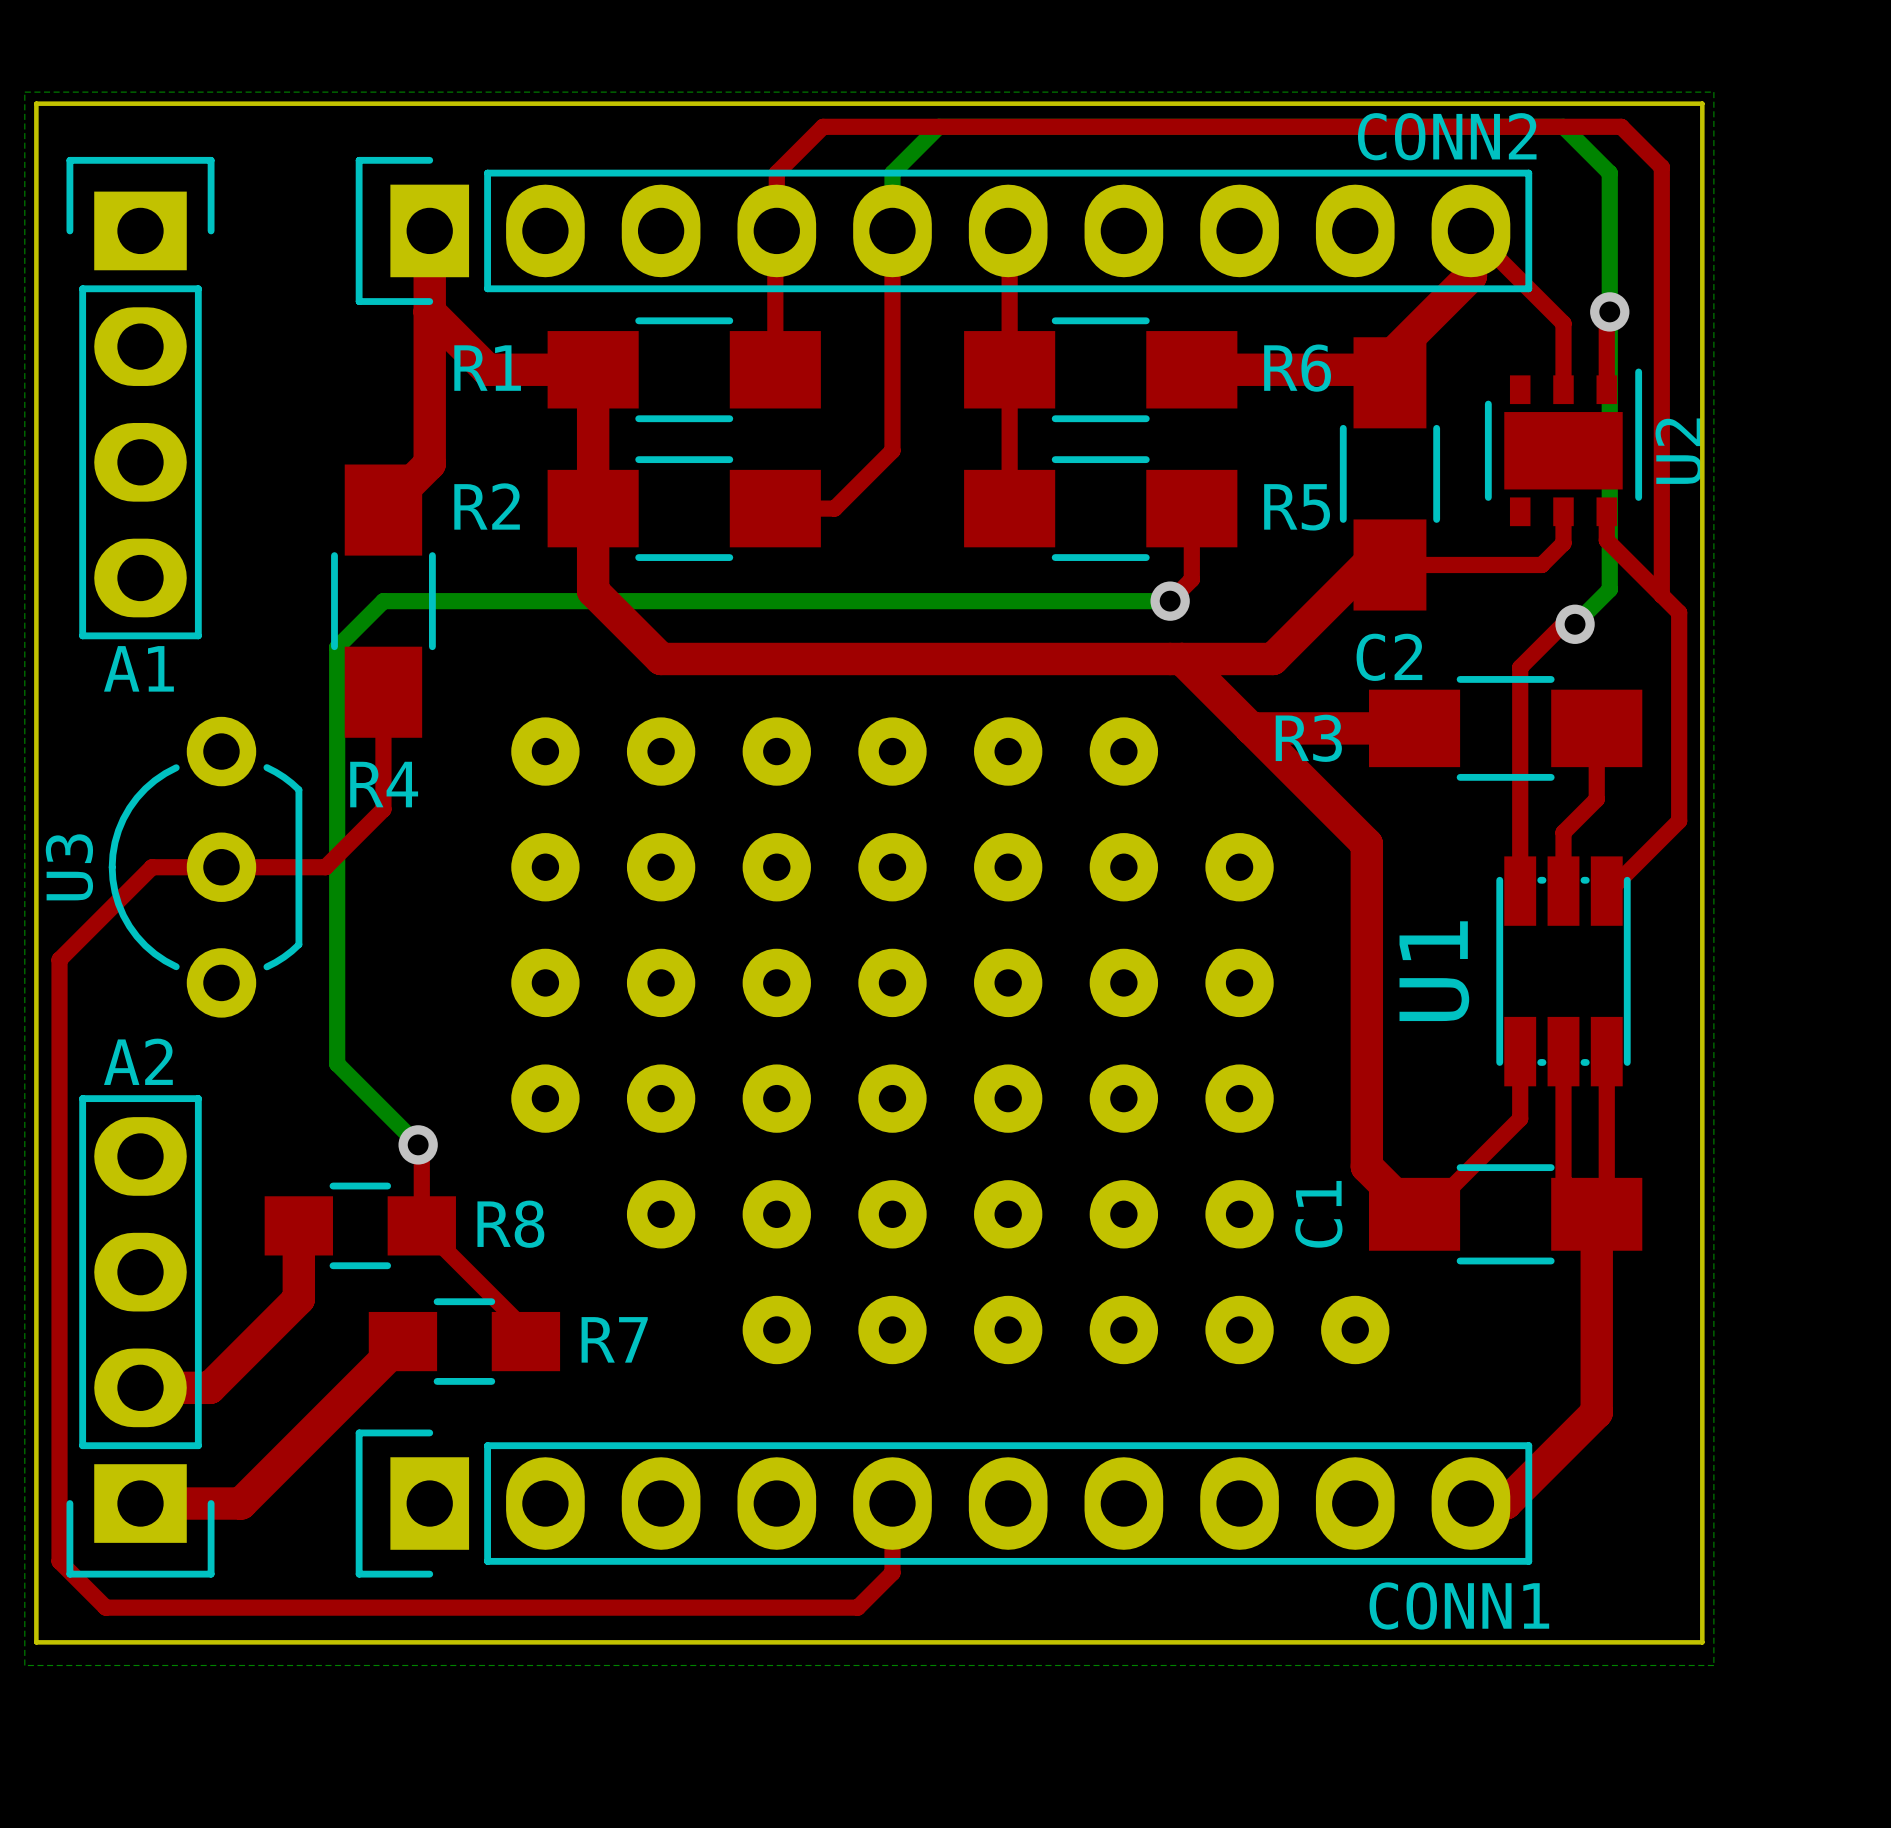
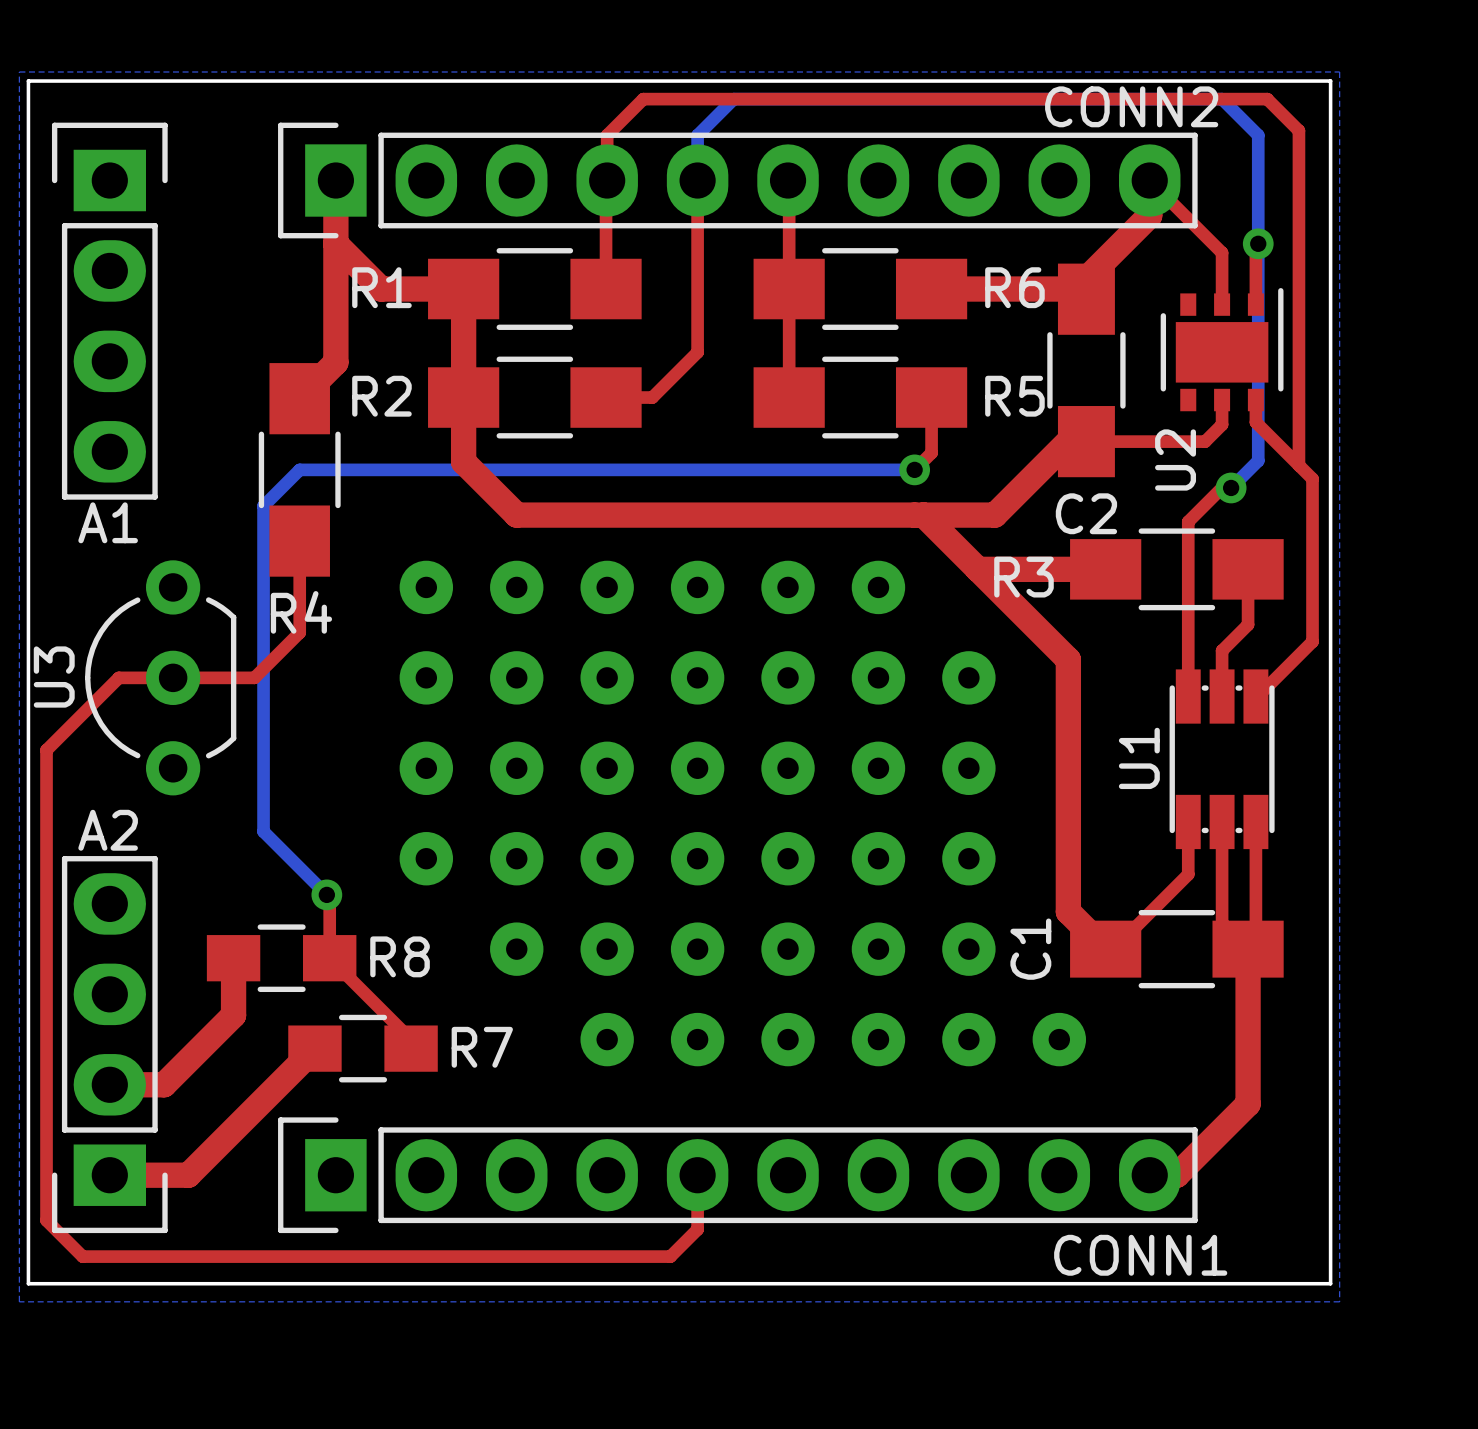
U2 name position: U2 (1679, 451) -> U2 (1175, 459)
text: U1 (1434, 971) -> none
U1 name: none -> U1 (1139, 758)

